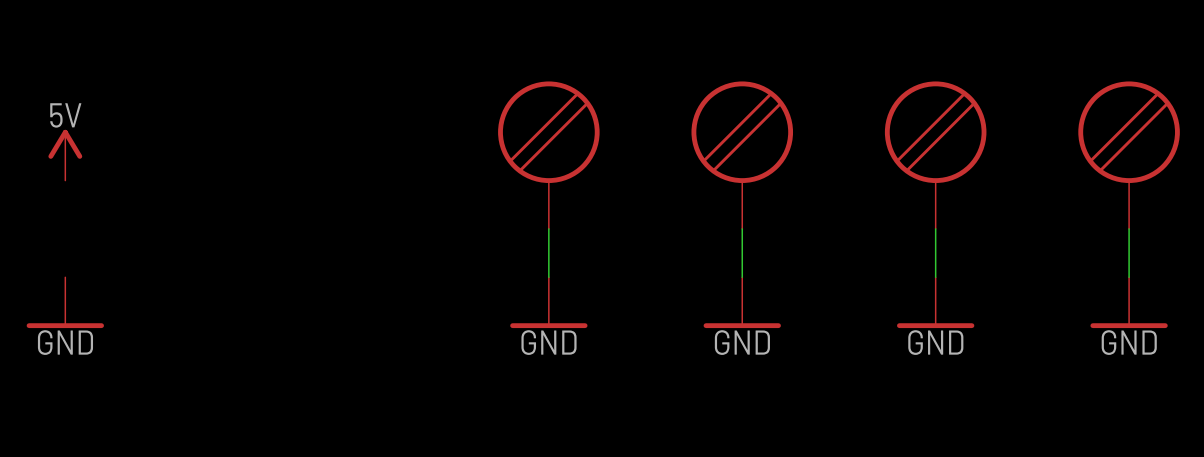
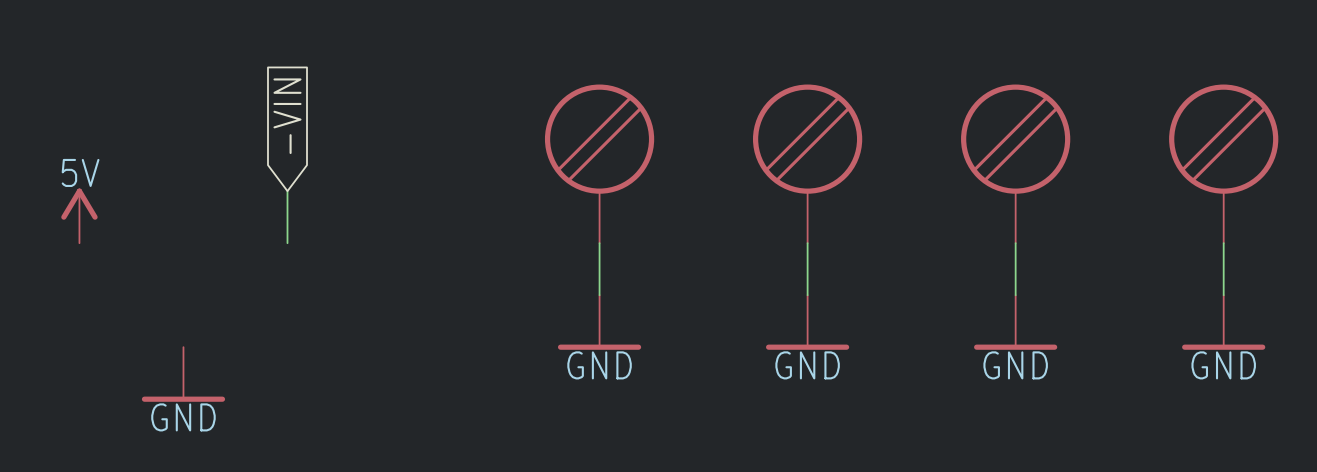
global label: none -> -VIN (287, 116)
power symbol position: 5V (65, 155) -> 5V (79, 215)
wire: none -> (287, 191) (287, 243)
power symbol position: GND (65, 302) -> GND (183, 374)

